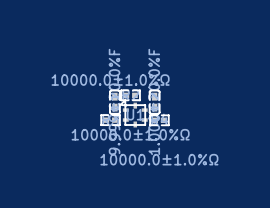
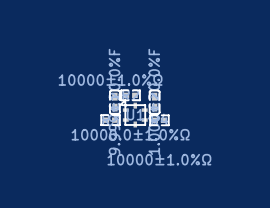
part value: 10000.0±1.0%Ω (110, 80) -> 10000±1.0%Ω (110, 80)
part value: 10000.0±1.0%Ω (159, 159) -> 10000±1.0%Ω (159, 159)

